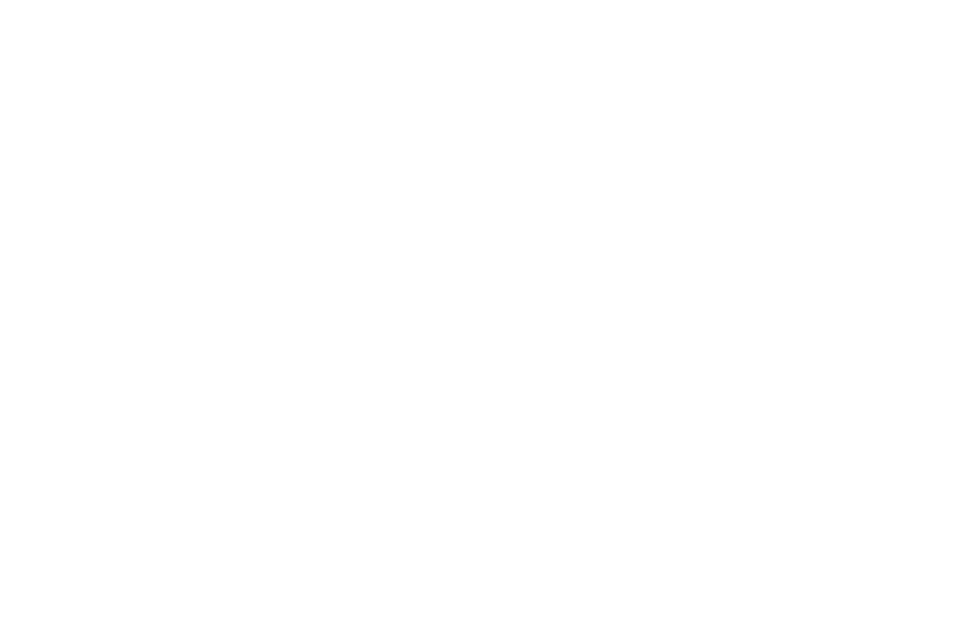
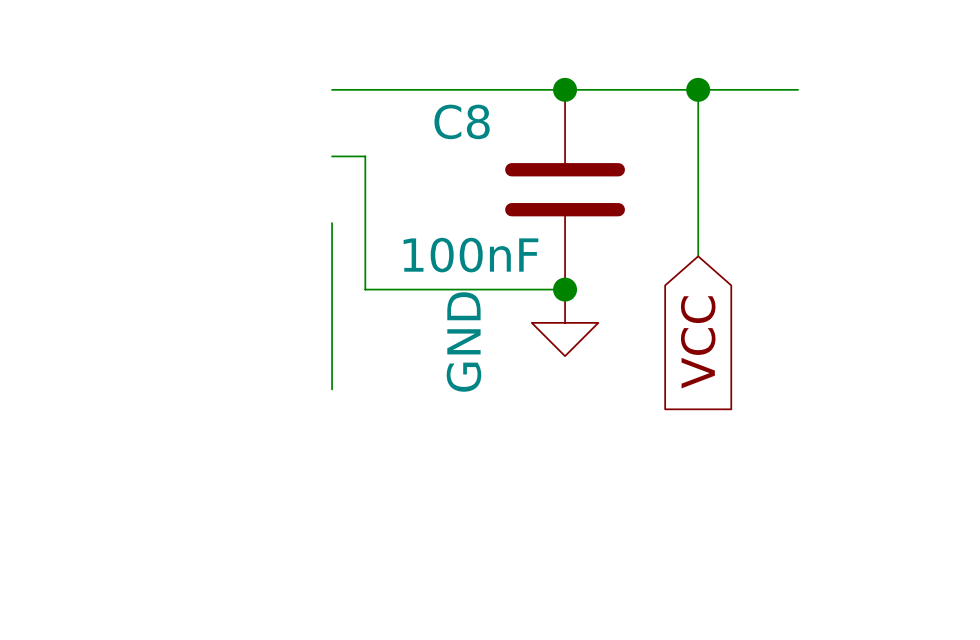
wire: none -> (332, 89) (798, 89)
junction: none -> (565, 89)
wire: none -> (698, 89) (698, 256)
junction: none -> (698, 89)
wire: none -> (332, 156) (365, 156) (365, 289) (565, 289)
C8: none -> 100nF (565, 189)
wire: none -> (332, 223) (332, 389)
junction: none -> (565, 289)
power symbol: none -> GND (565, 322)
global label: none -> VCC (698, 342)

